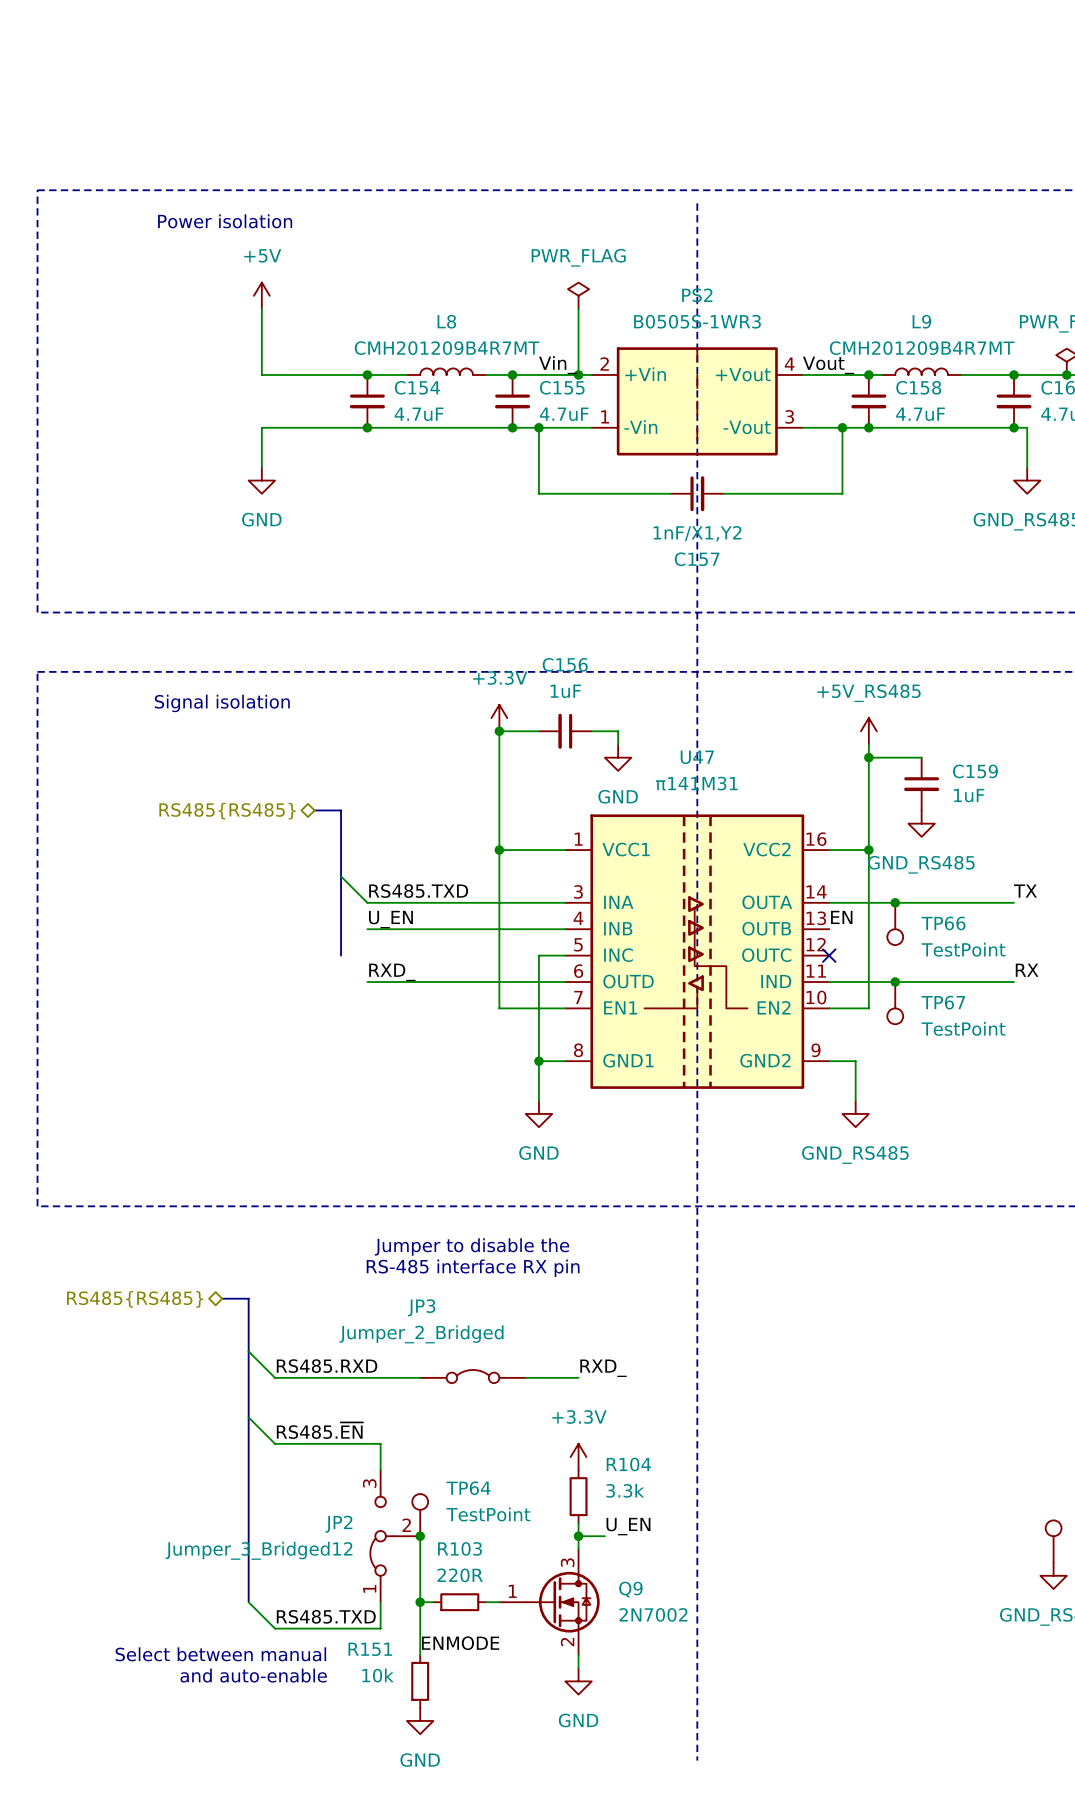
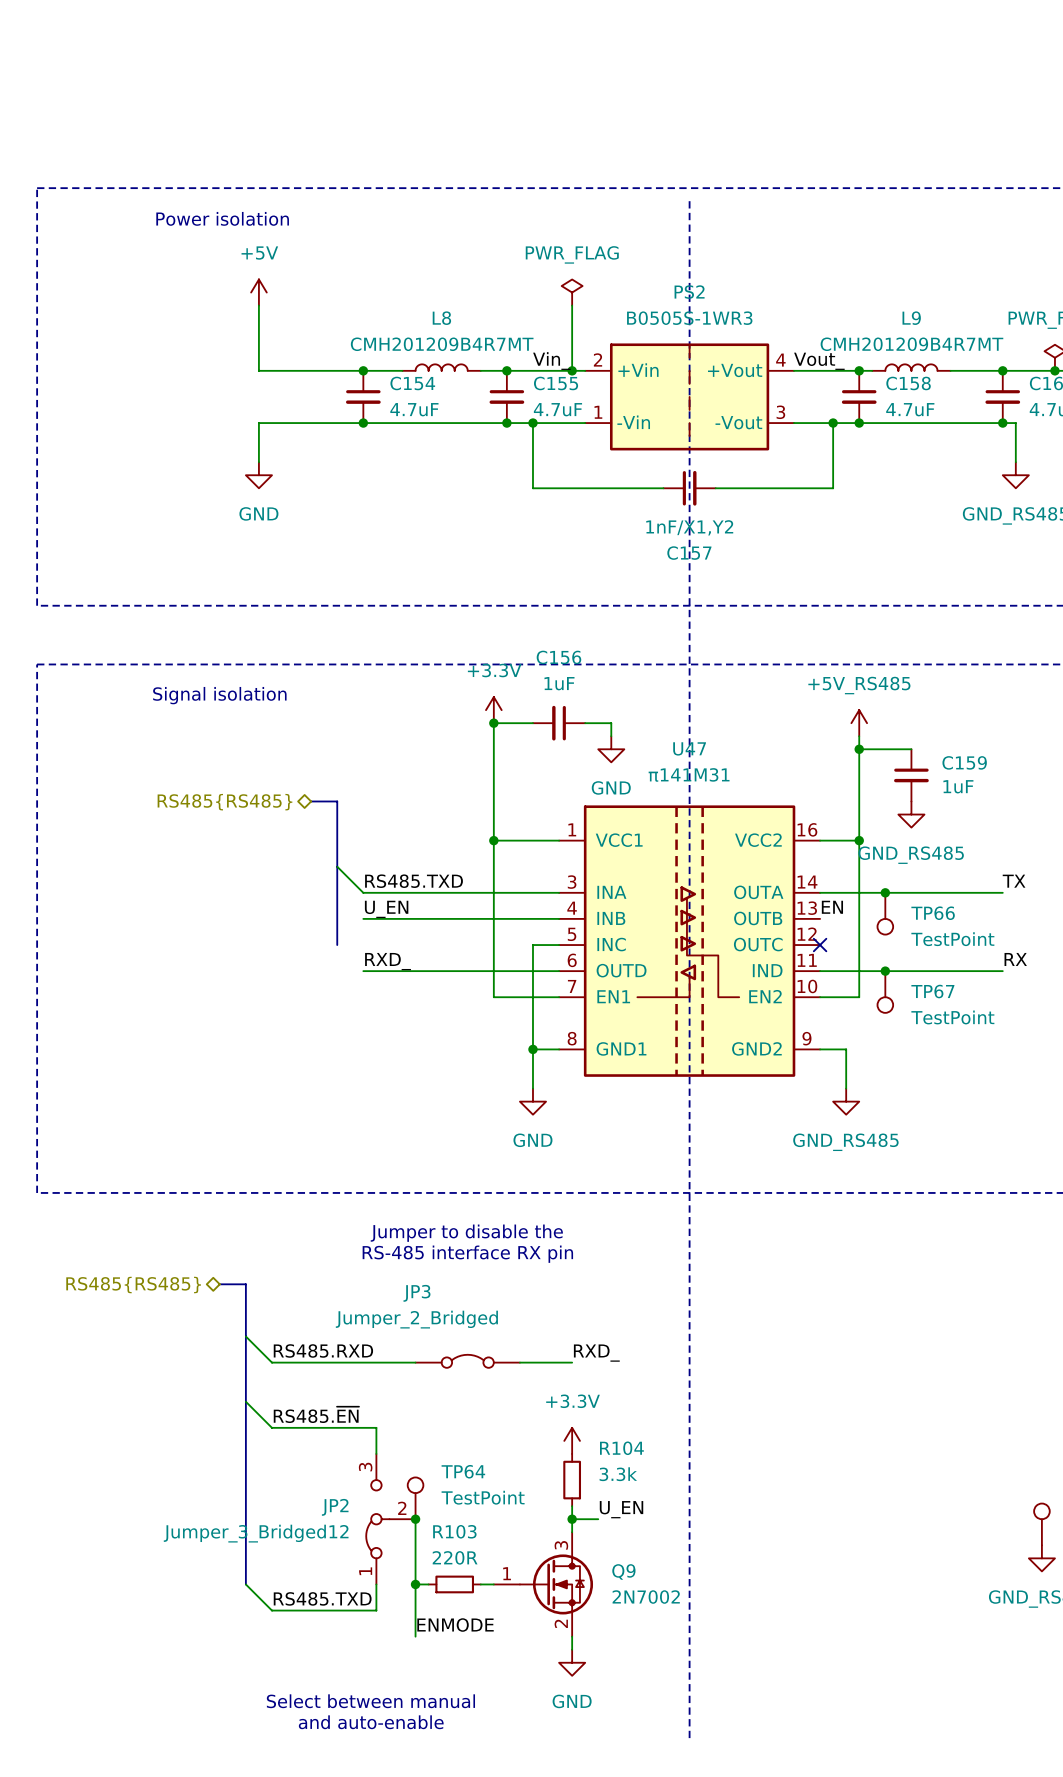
text position: Select between manual (220, 1654) -> Select between manual (370, 1701)
text position: and auto-enable (253, 1675) -> and auto-enable (371, 1722)
R151: 10k (420, 1681) -> none
power symbol: GND (420, 1720) -> none

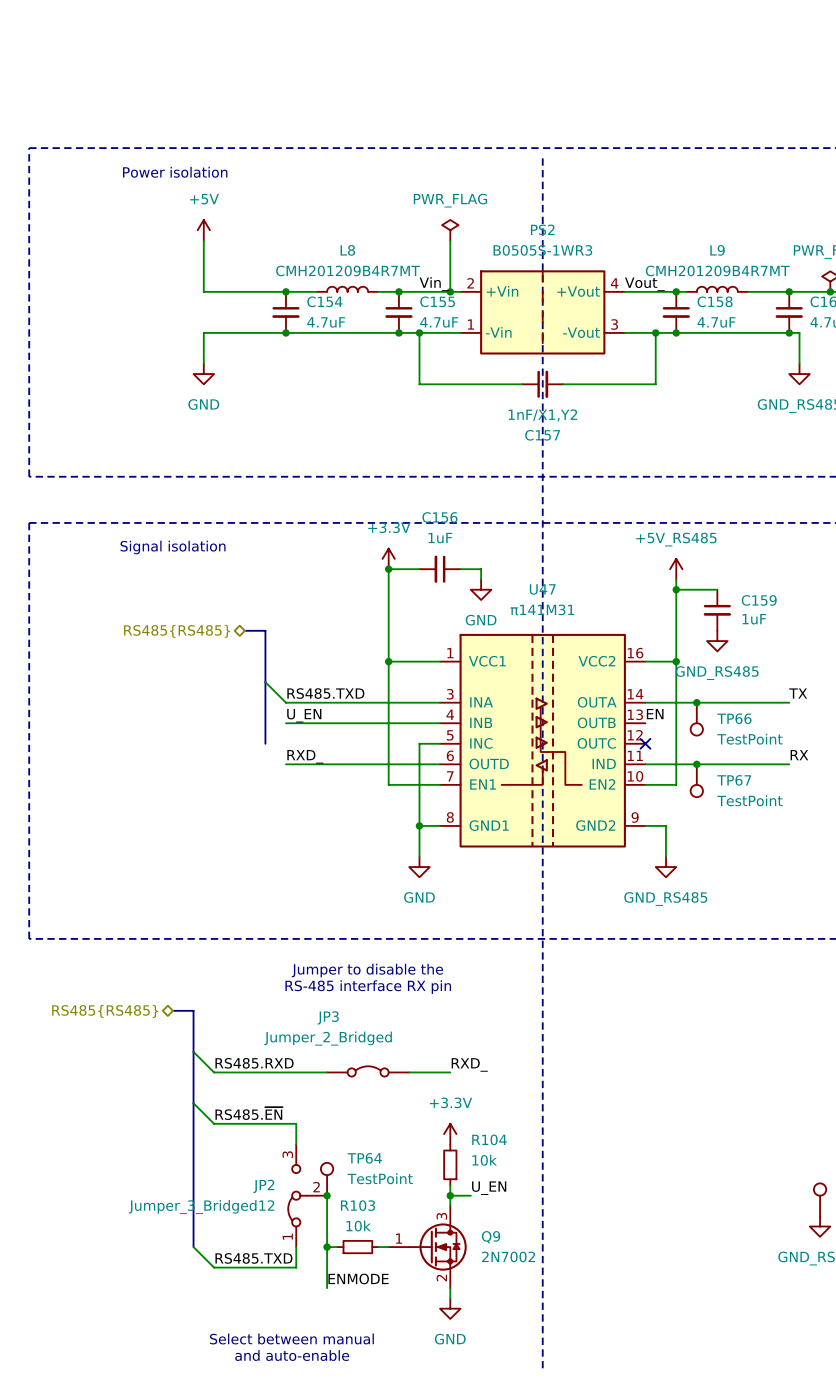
R104 value: 3.3k (618, 1474) -> 10k (484, 1160)
R103 value: 220R (455, 1557) -> 10k (358, 1226)

